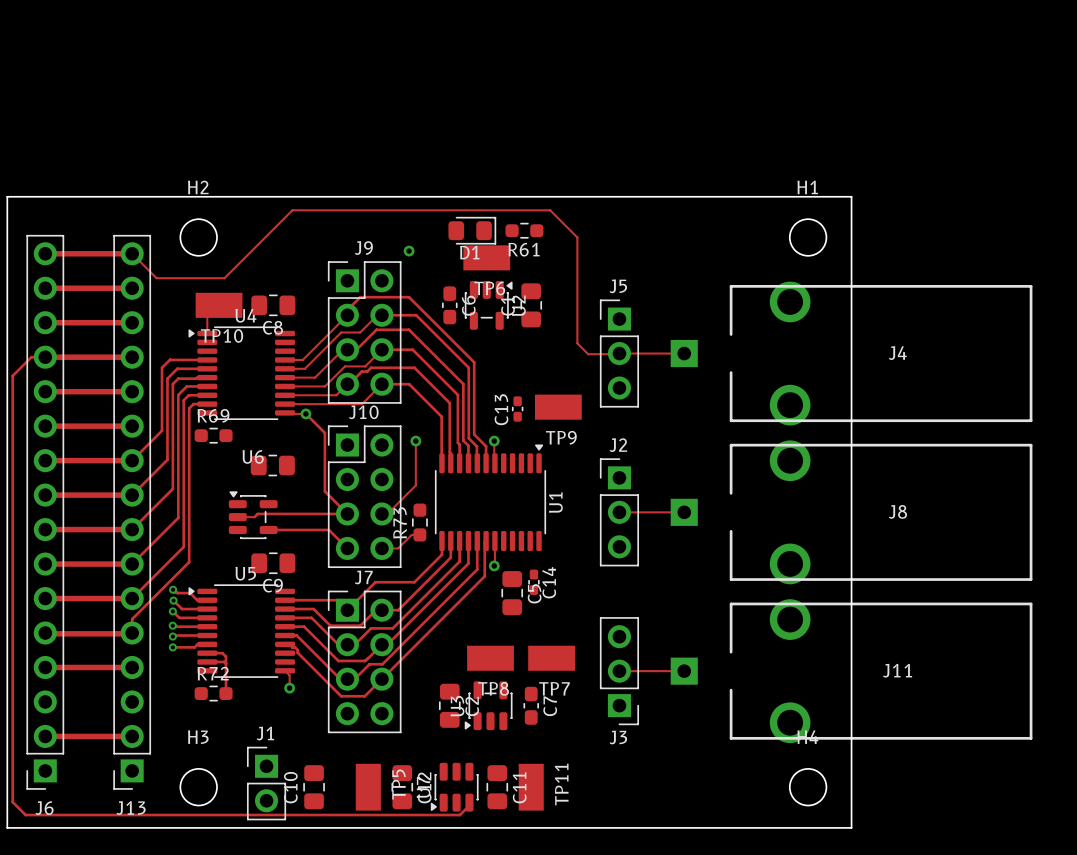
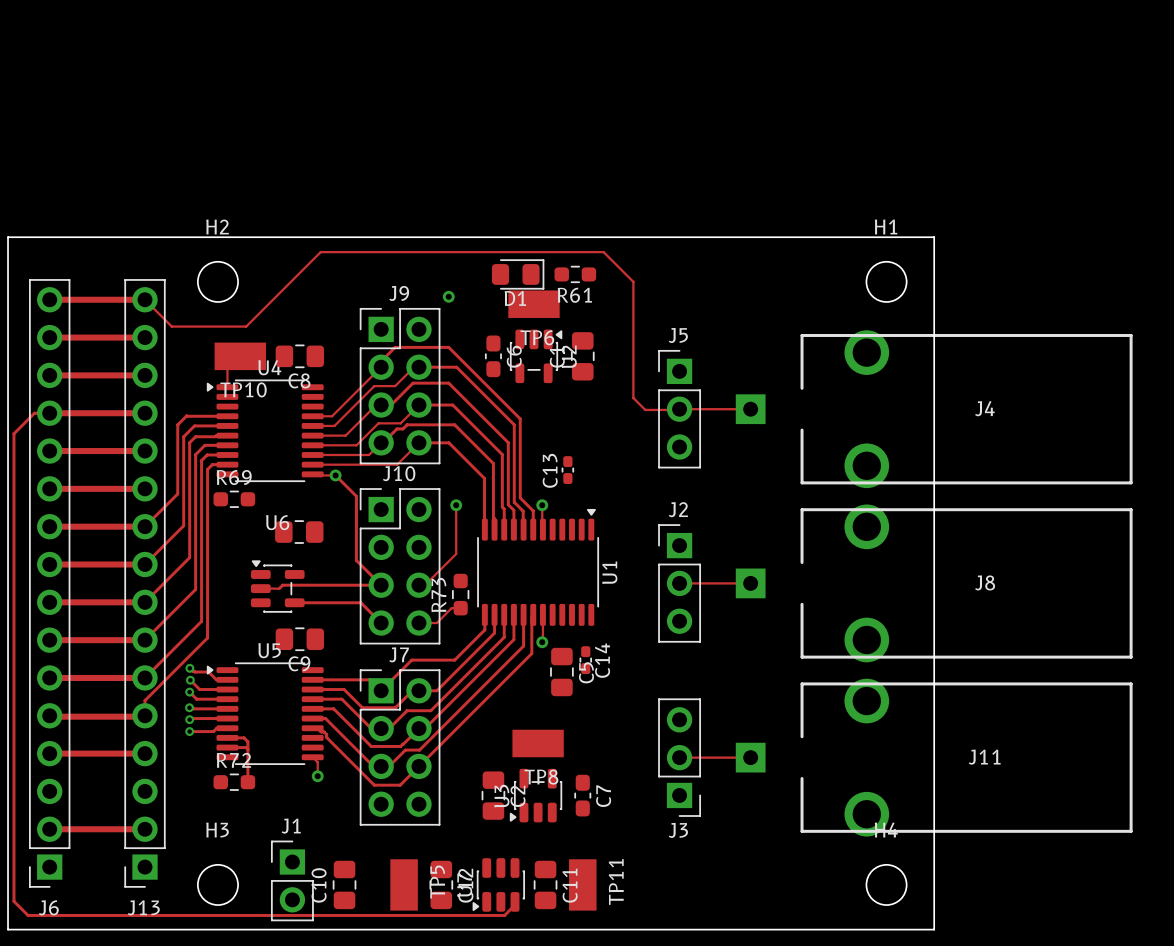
TP9: (558, 407) -> none
TP7: (551, 658) -> none

